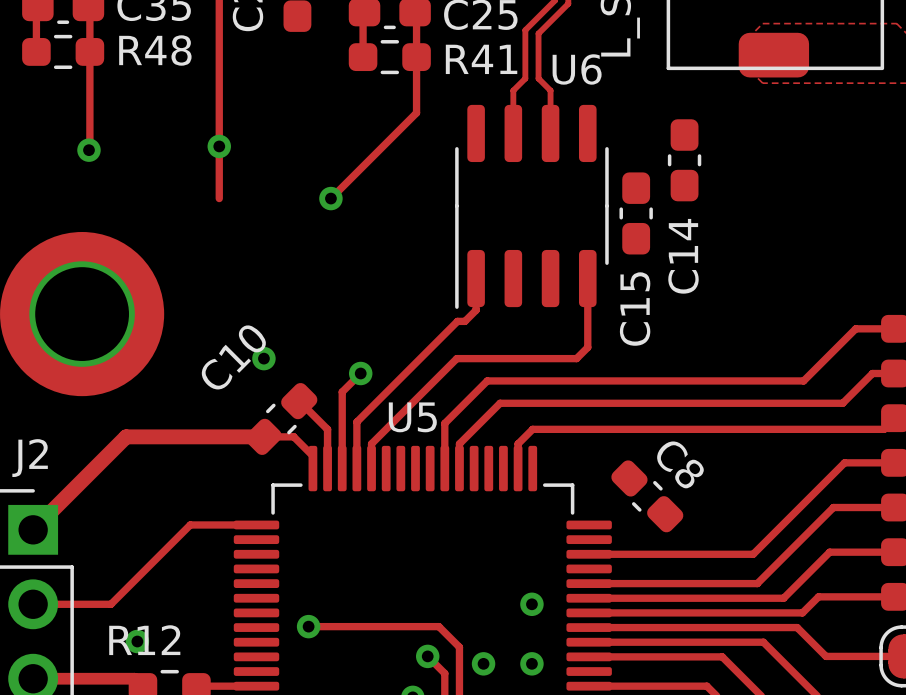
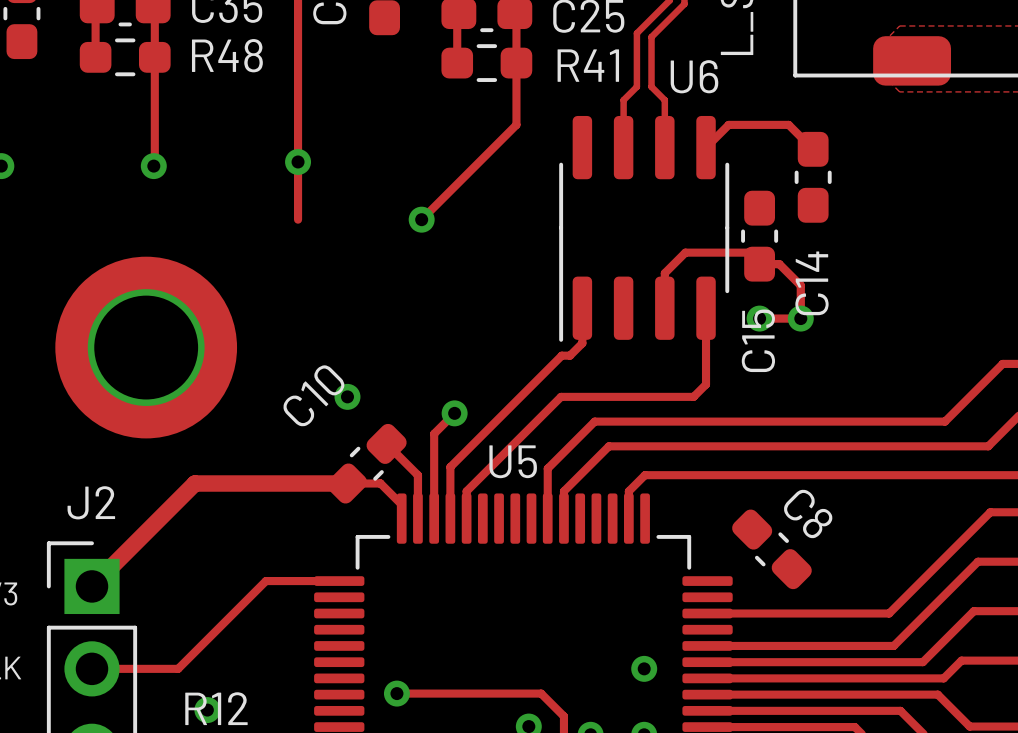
track: none -> (706, 147) (728, 124) (788, 124) (813, 149)
track: none -> (664, 308) (664, 273) (685, 252) (748, 252) (759, 264) (779, 264) (800, 285) (800, 318) (759, 318)
via: none -> (759, 318)
via: none -> (800, 318)

